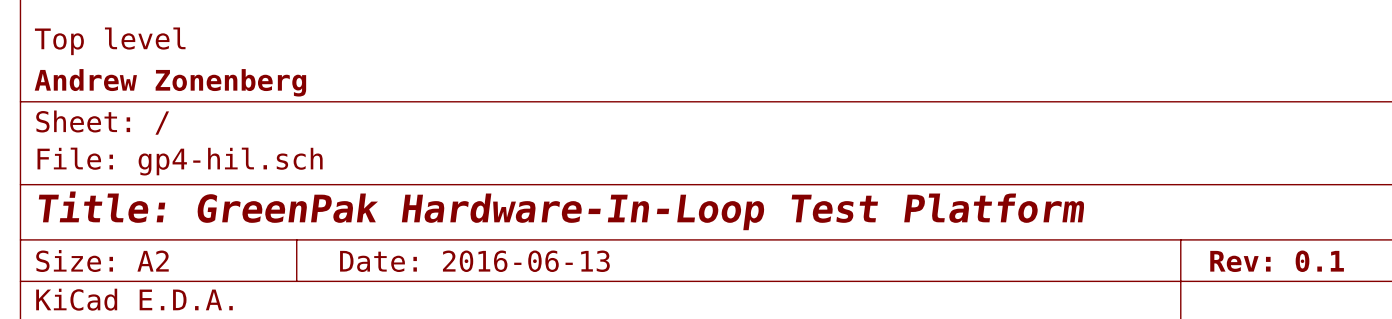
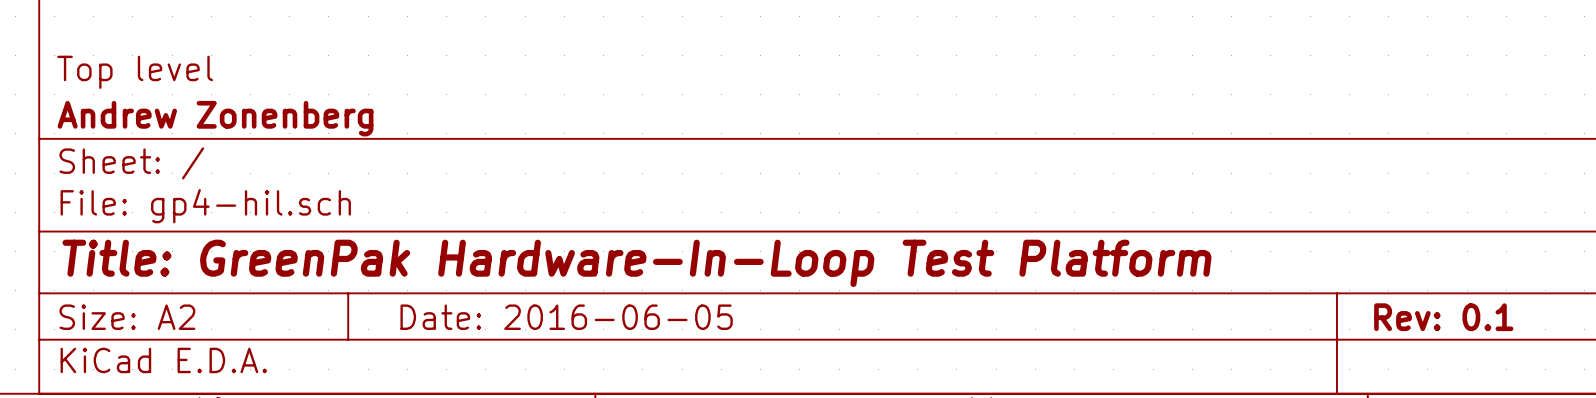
title block: Date: 2016-06-13 (474, 261) -> Date: 2016-06-05 (566, 317)

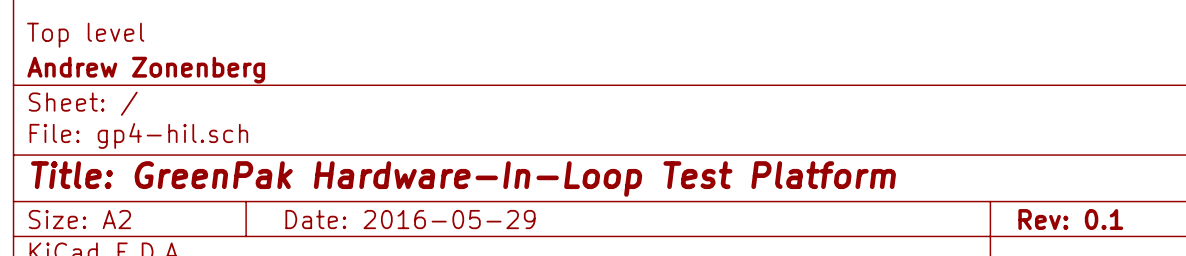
title block: Date: 2016-06-05 (566, 317) -> Date: 2016-05-29 (410, 219)

